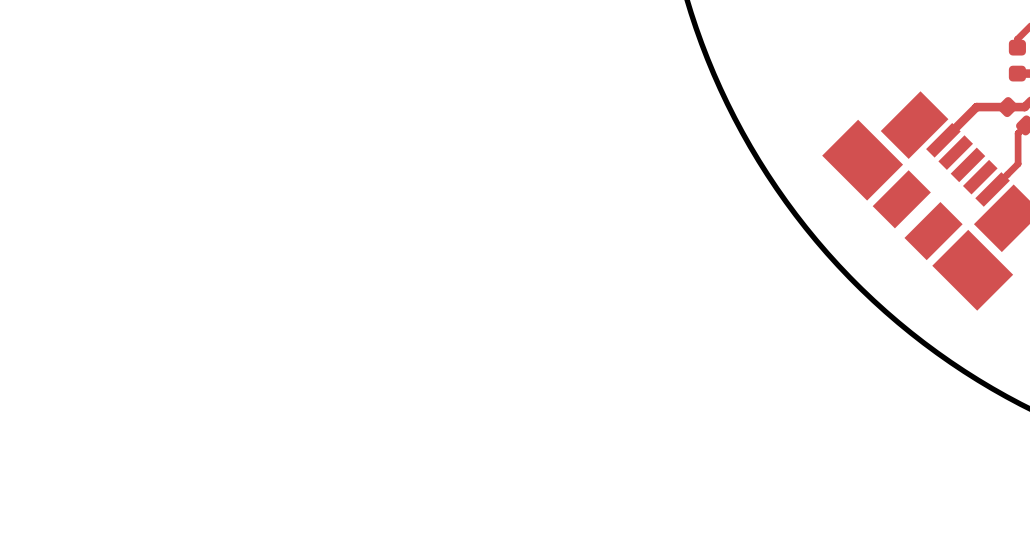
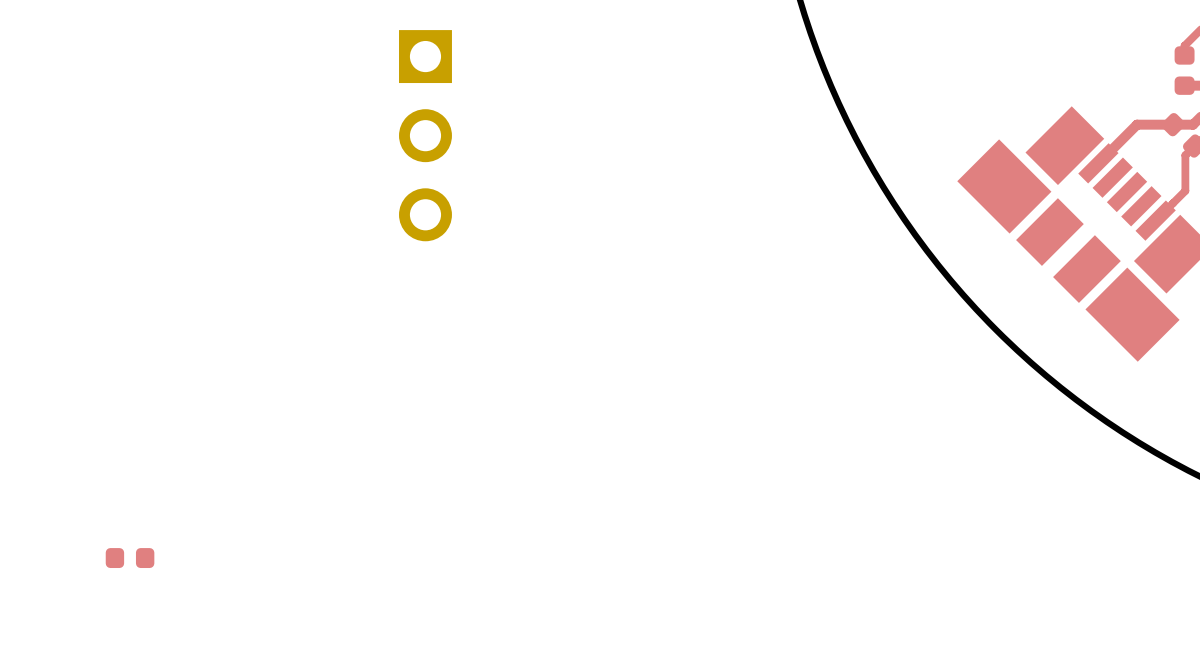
part: none -> (425, 135)
part: none -> (130, 558)

